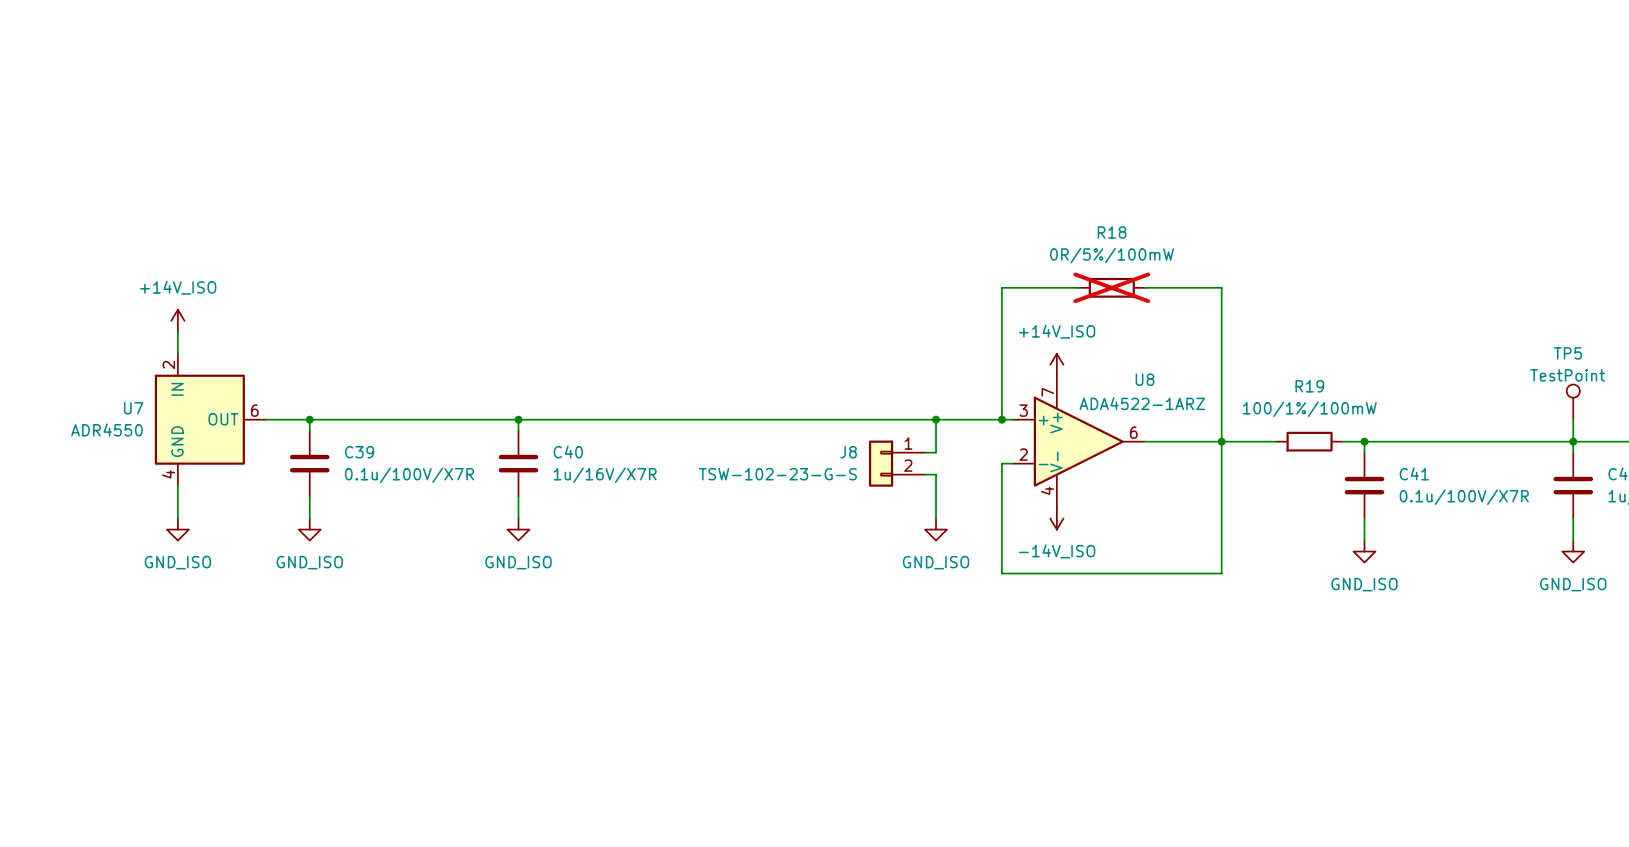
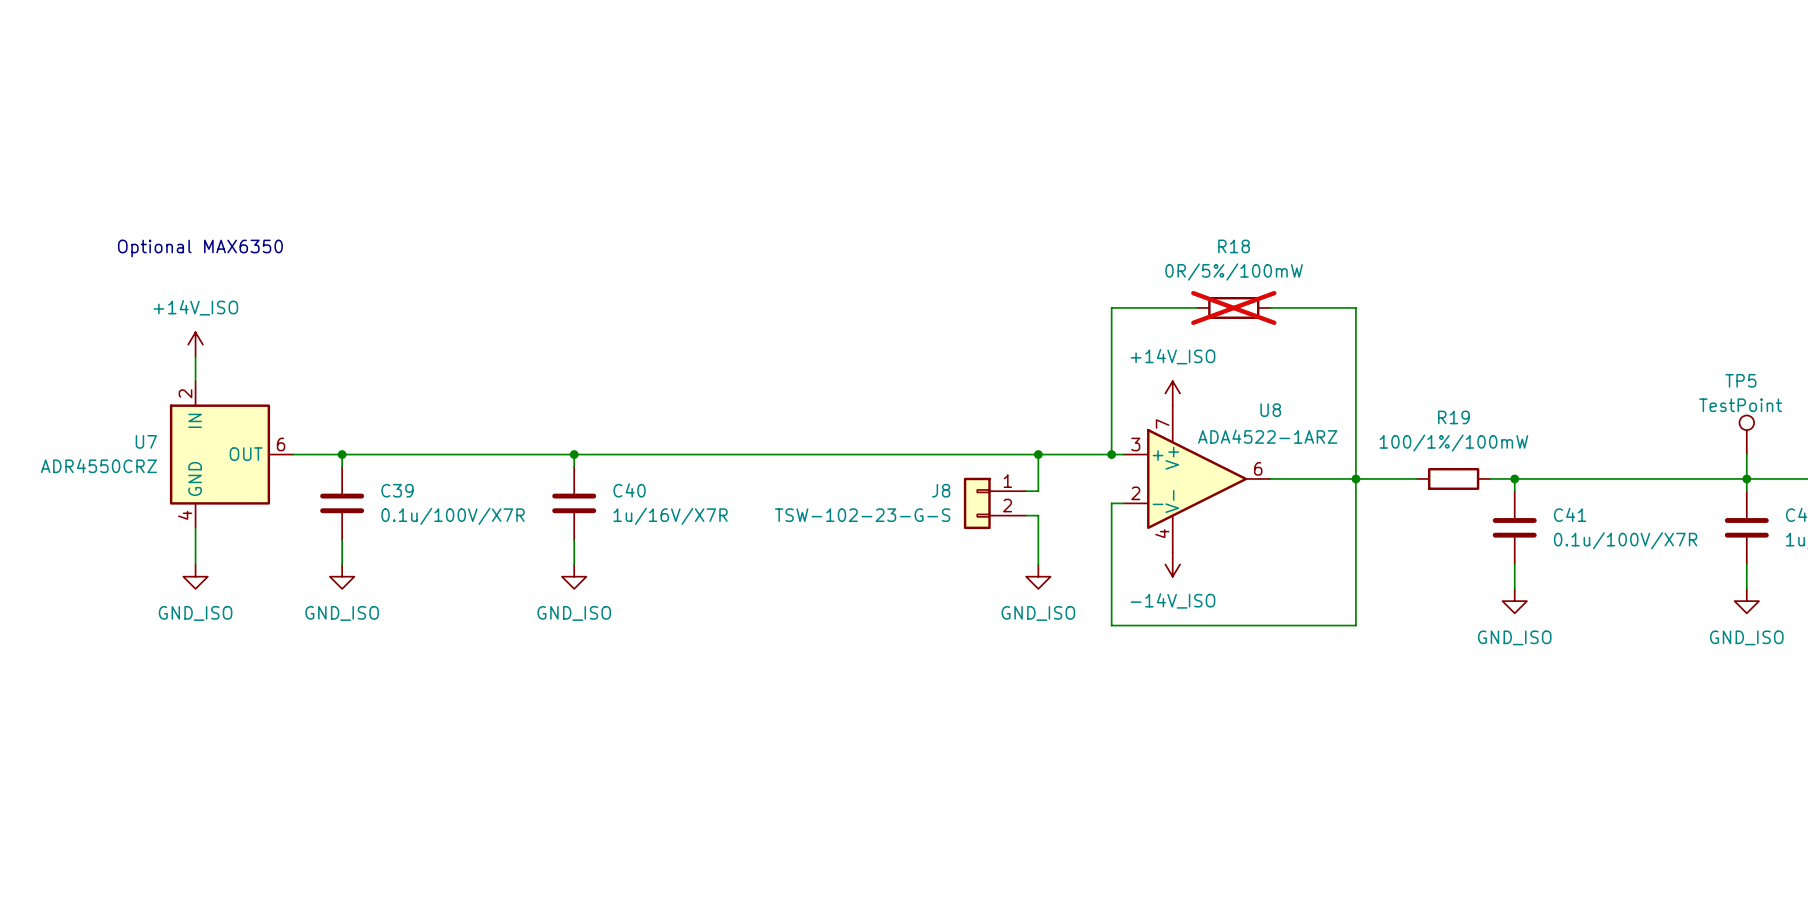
text: none -> Optional MAX6350 (200, 248)
U7 value: ADR4550 (106, 430) -> ADR4550CRZ (98, 466)

